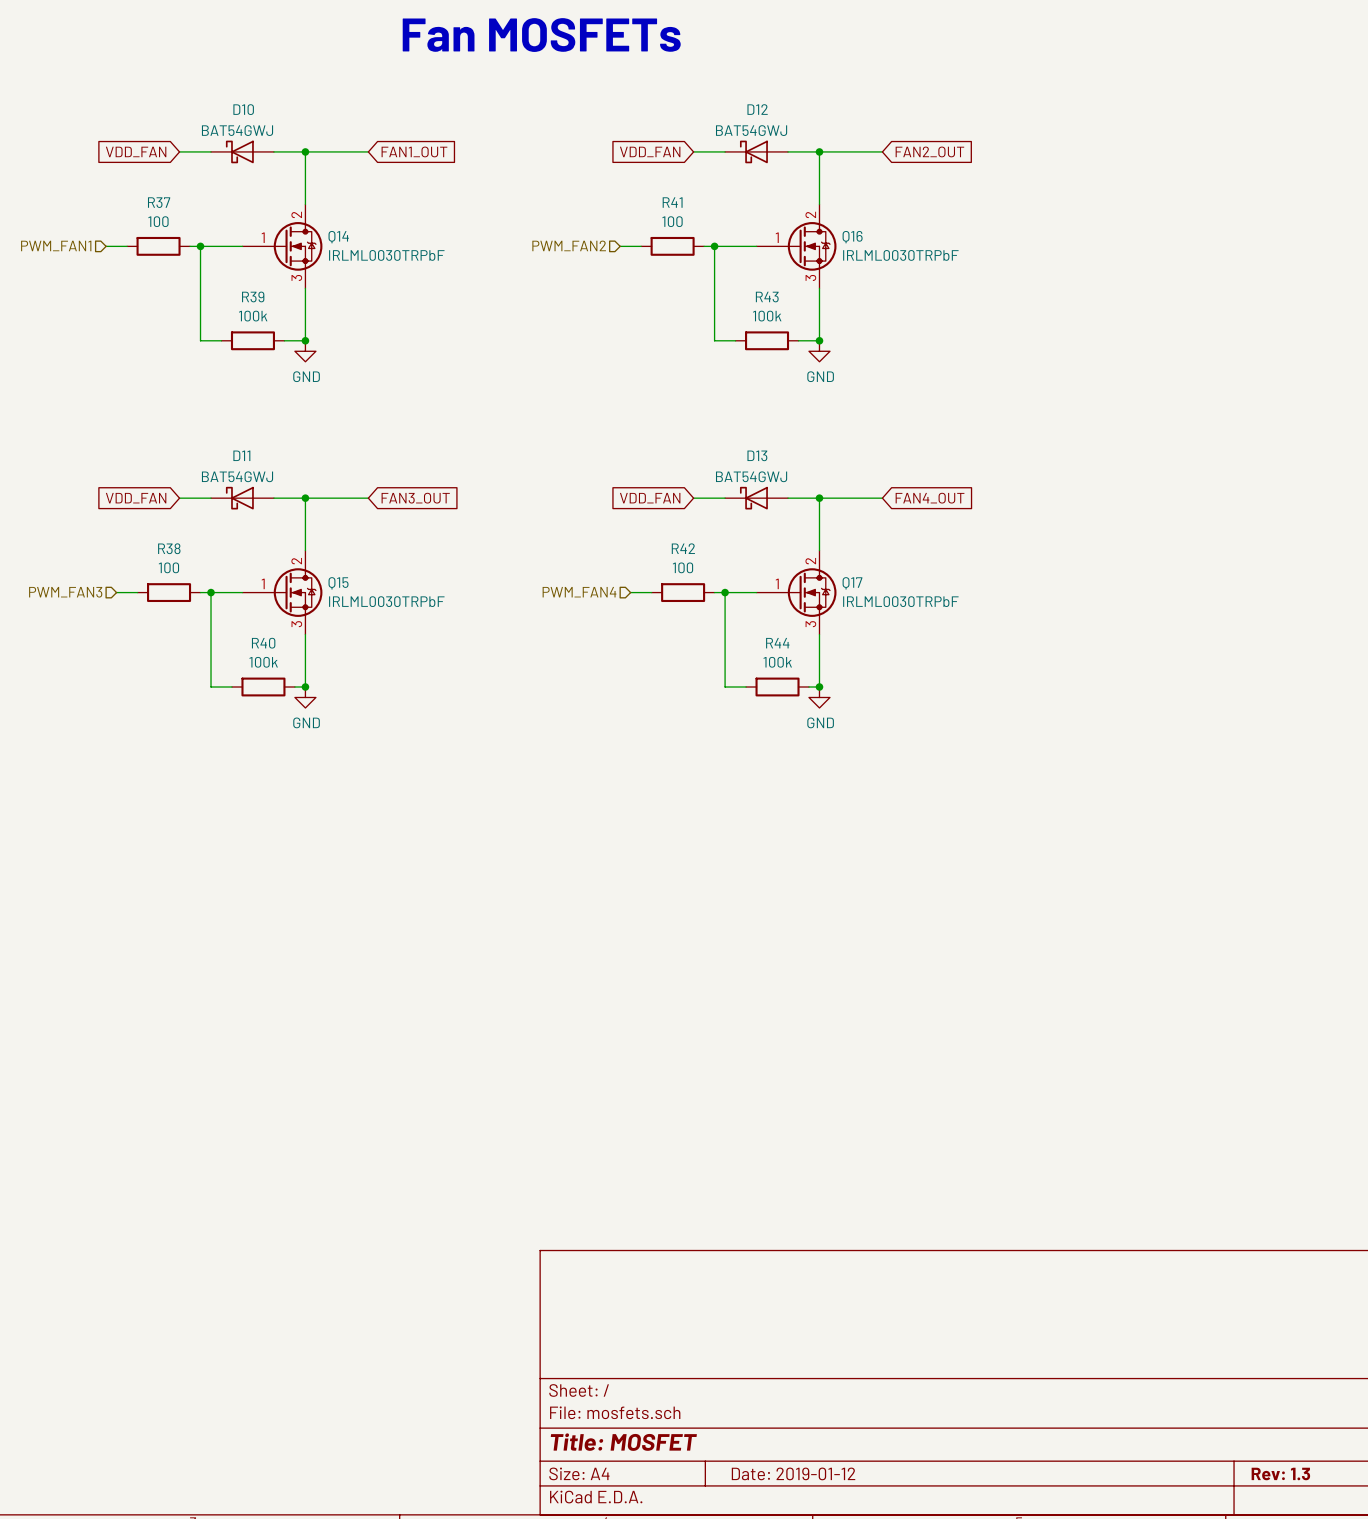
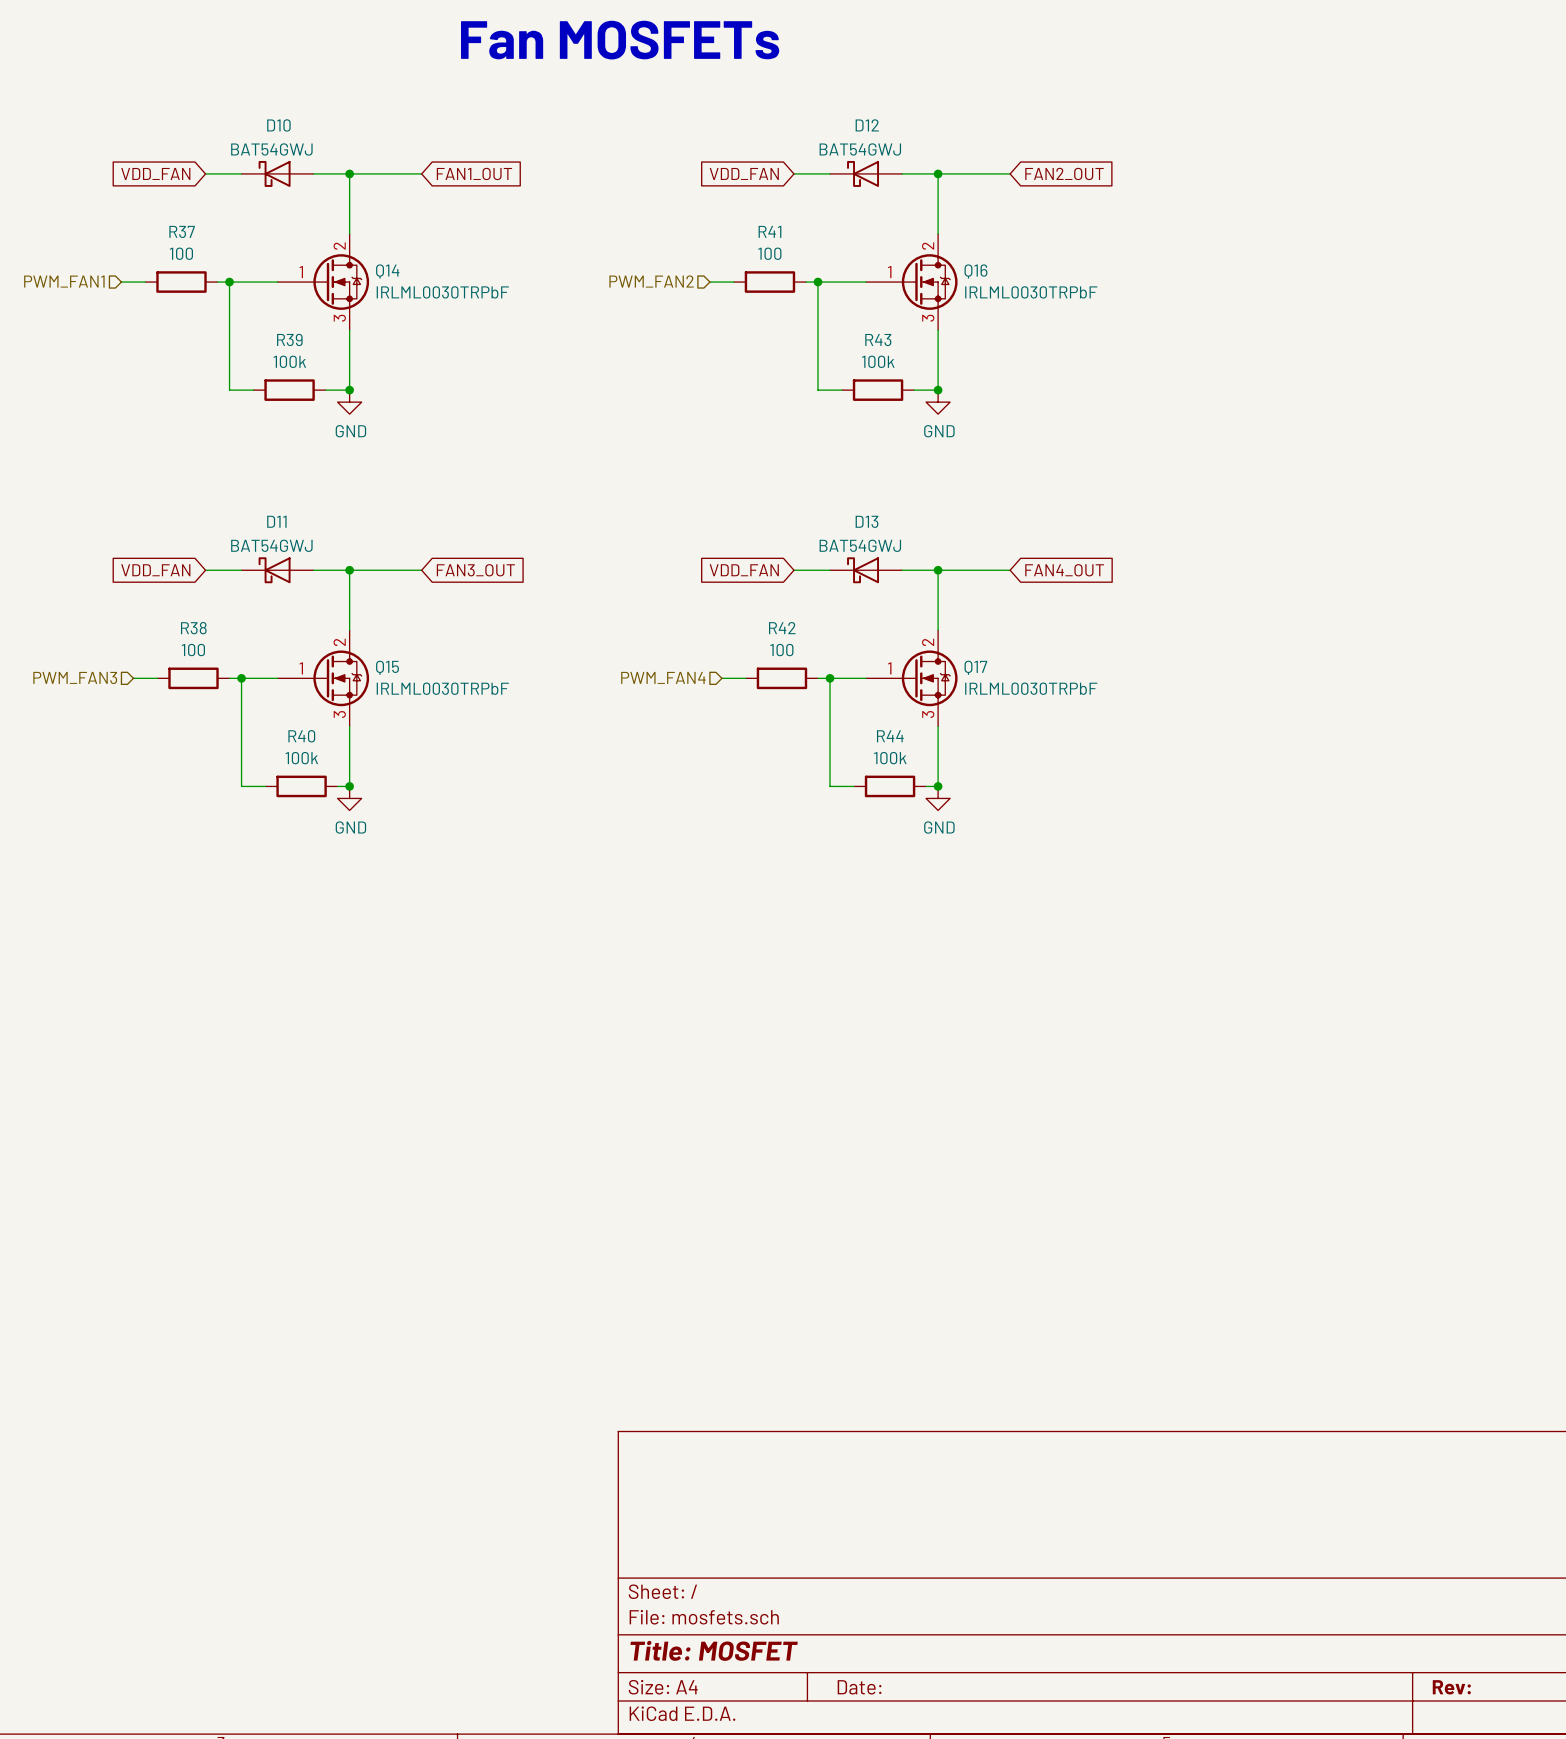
title block: Date: 2019-01-12 (793, 1473) -> Date: (859, 1687)
title block: Rev: 1.3 (1280, 1473) -> Rev: (1451, 1687)

